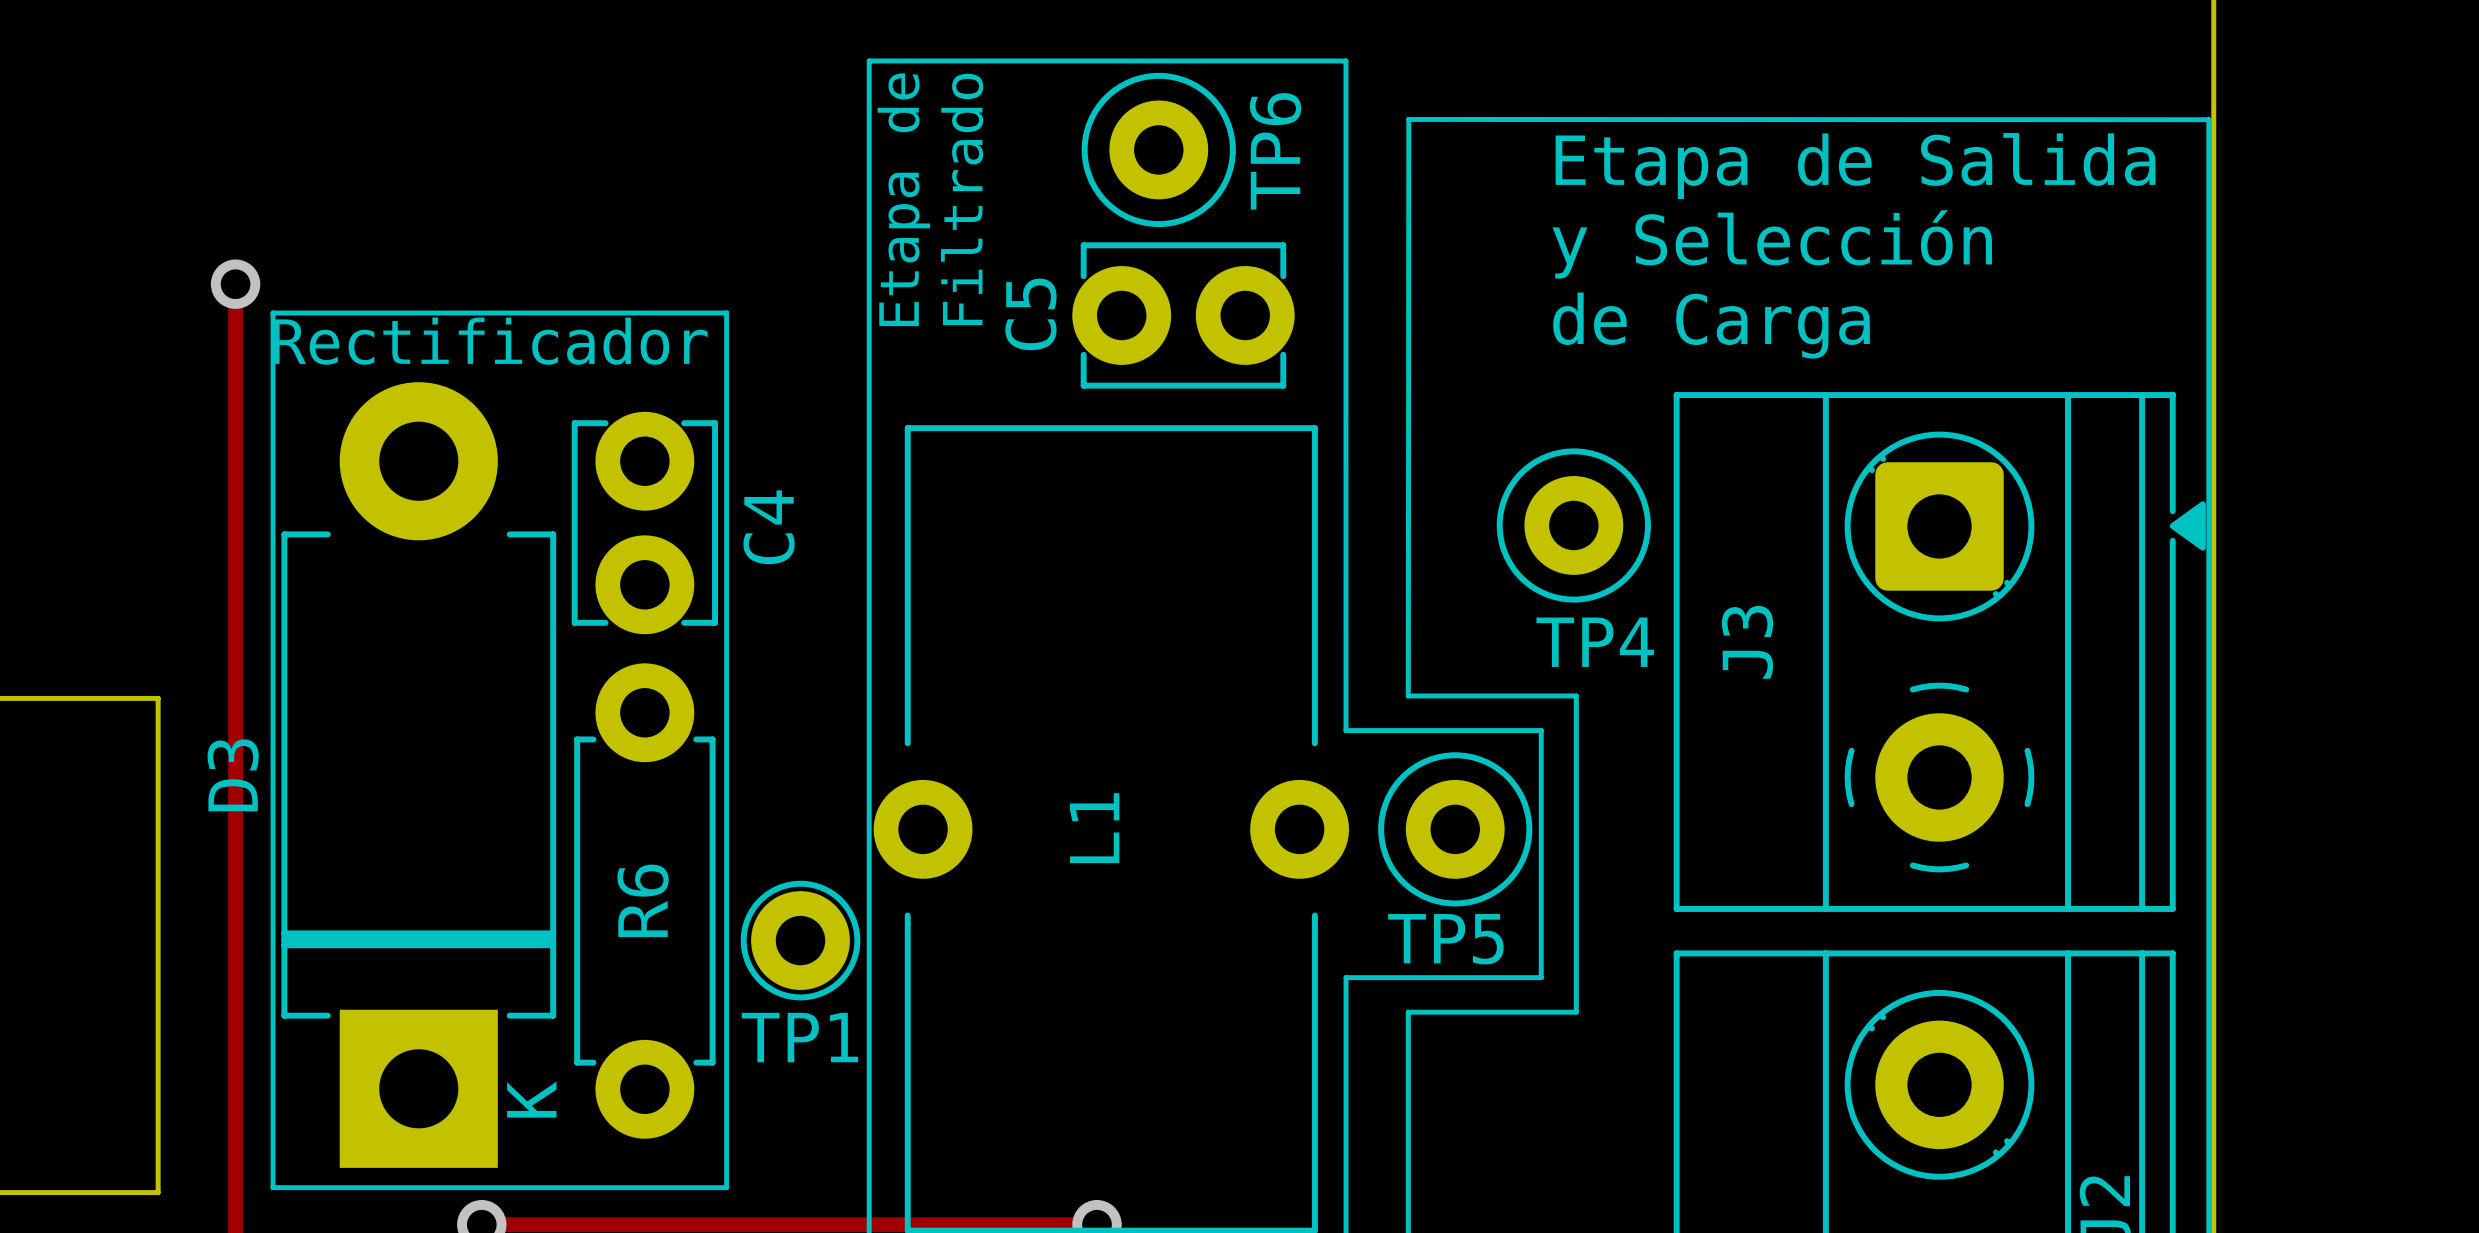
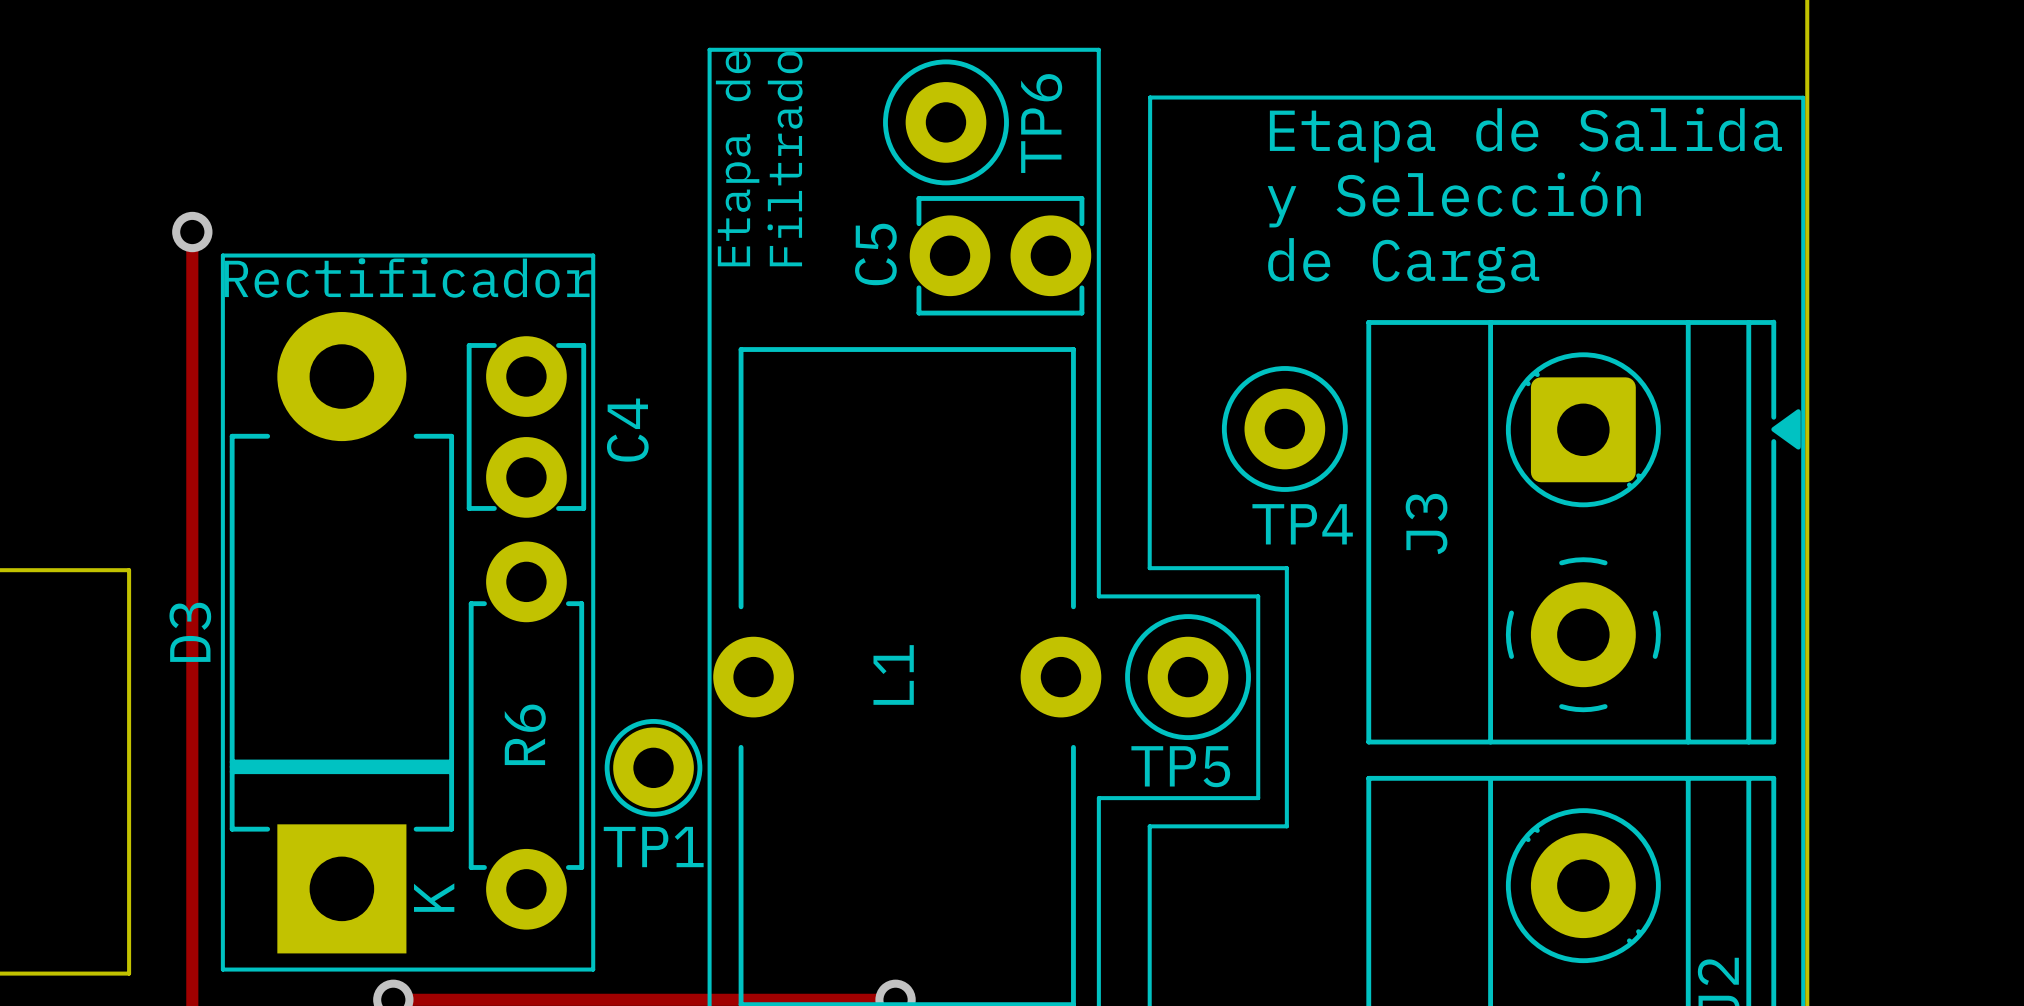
C5 position: (1183, 315) -> (1000, 255)

